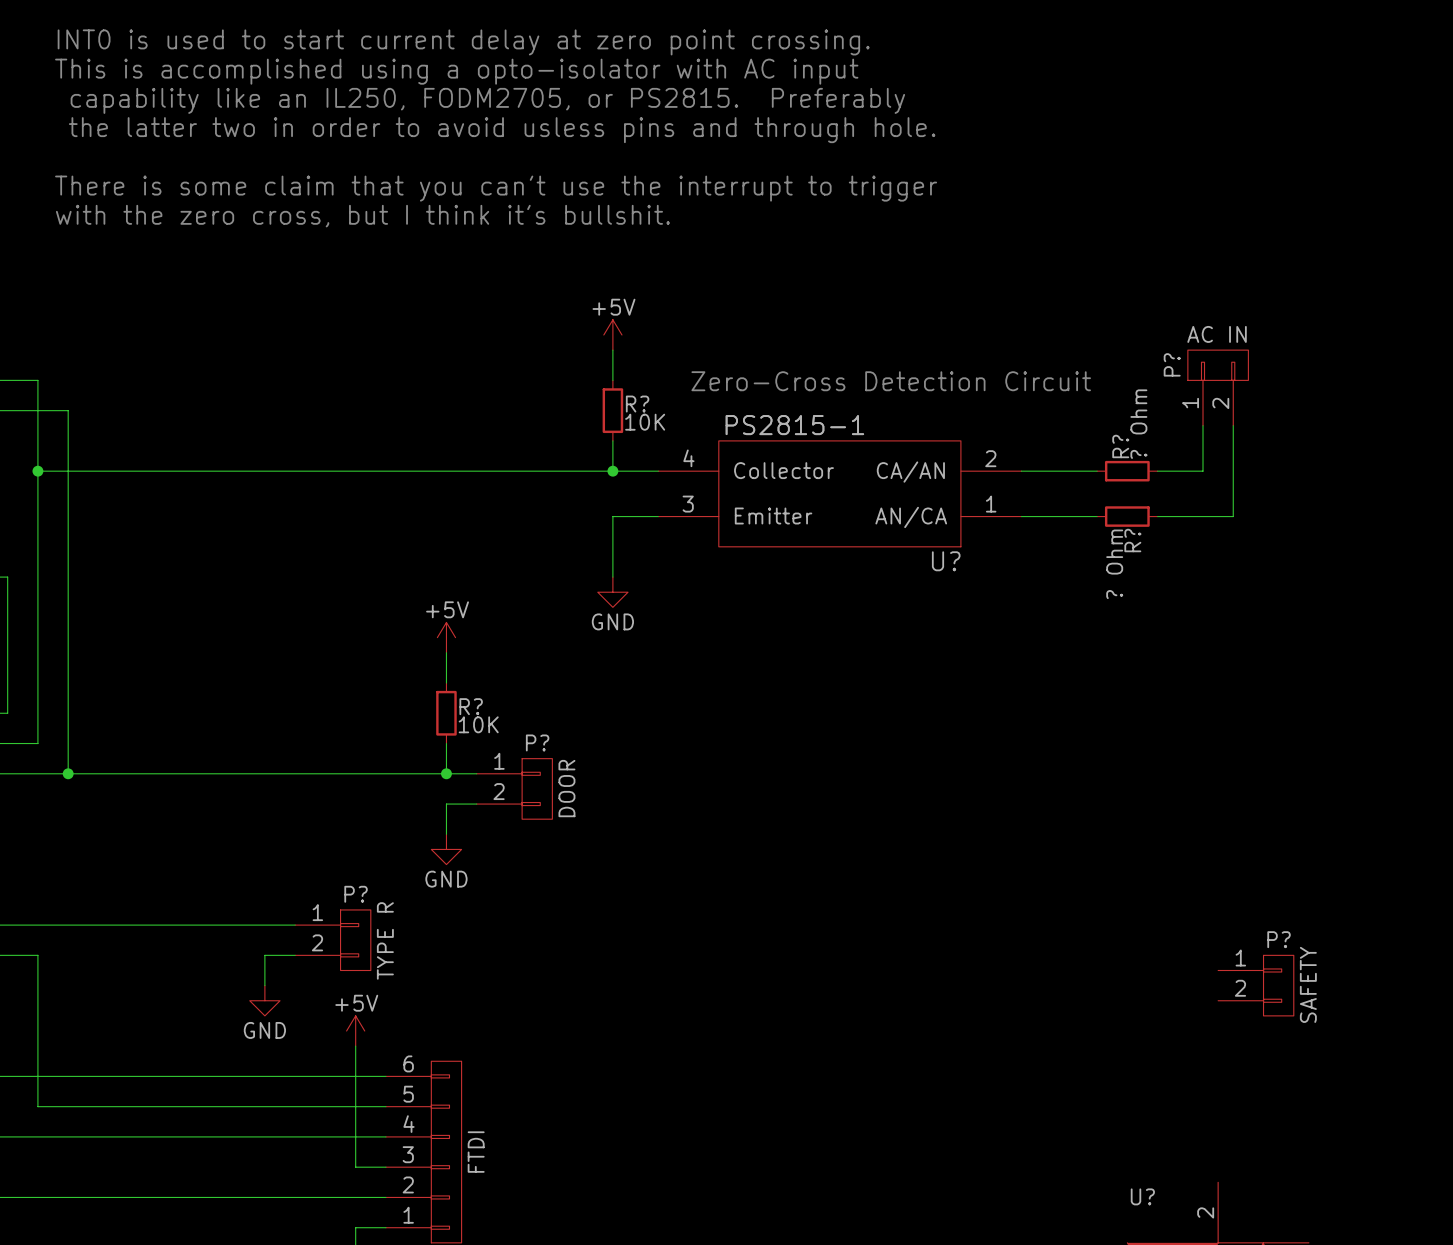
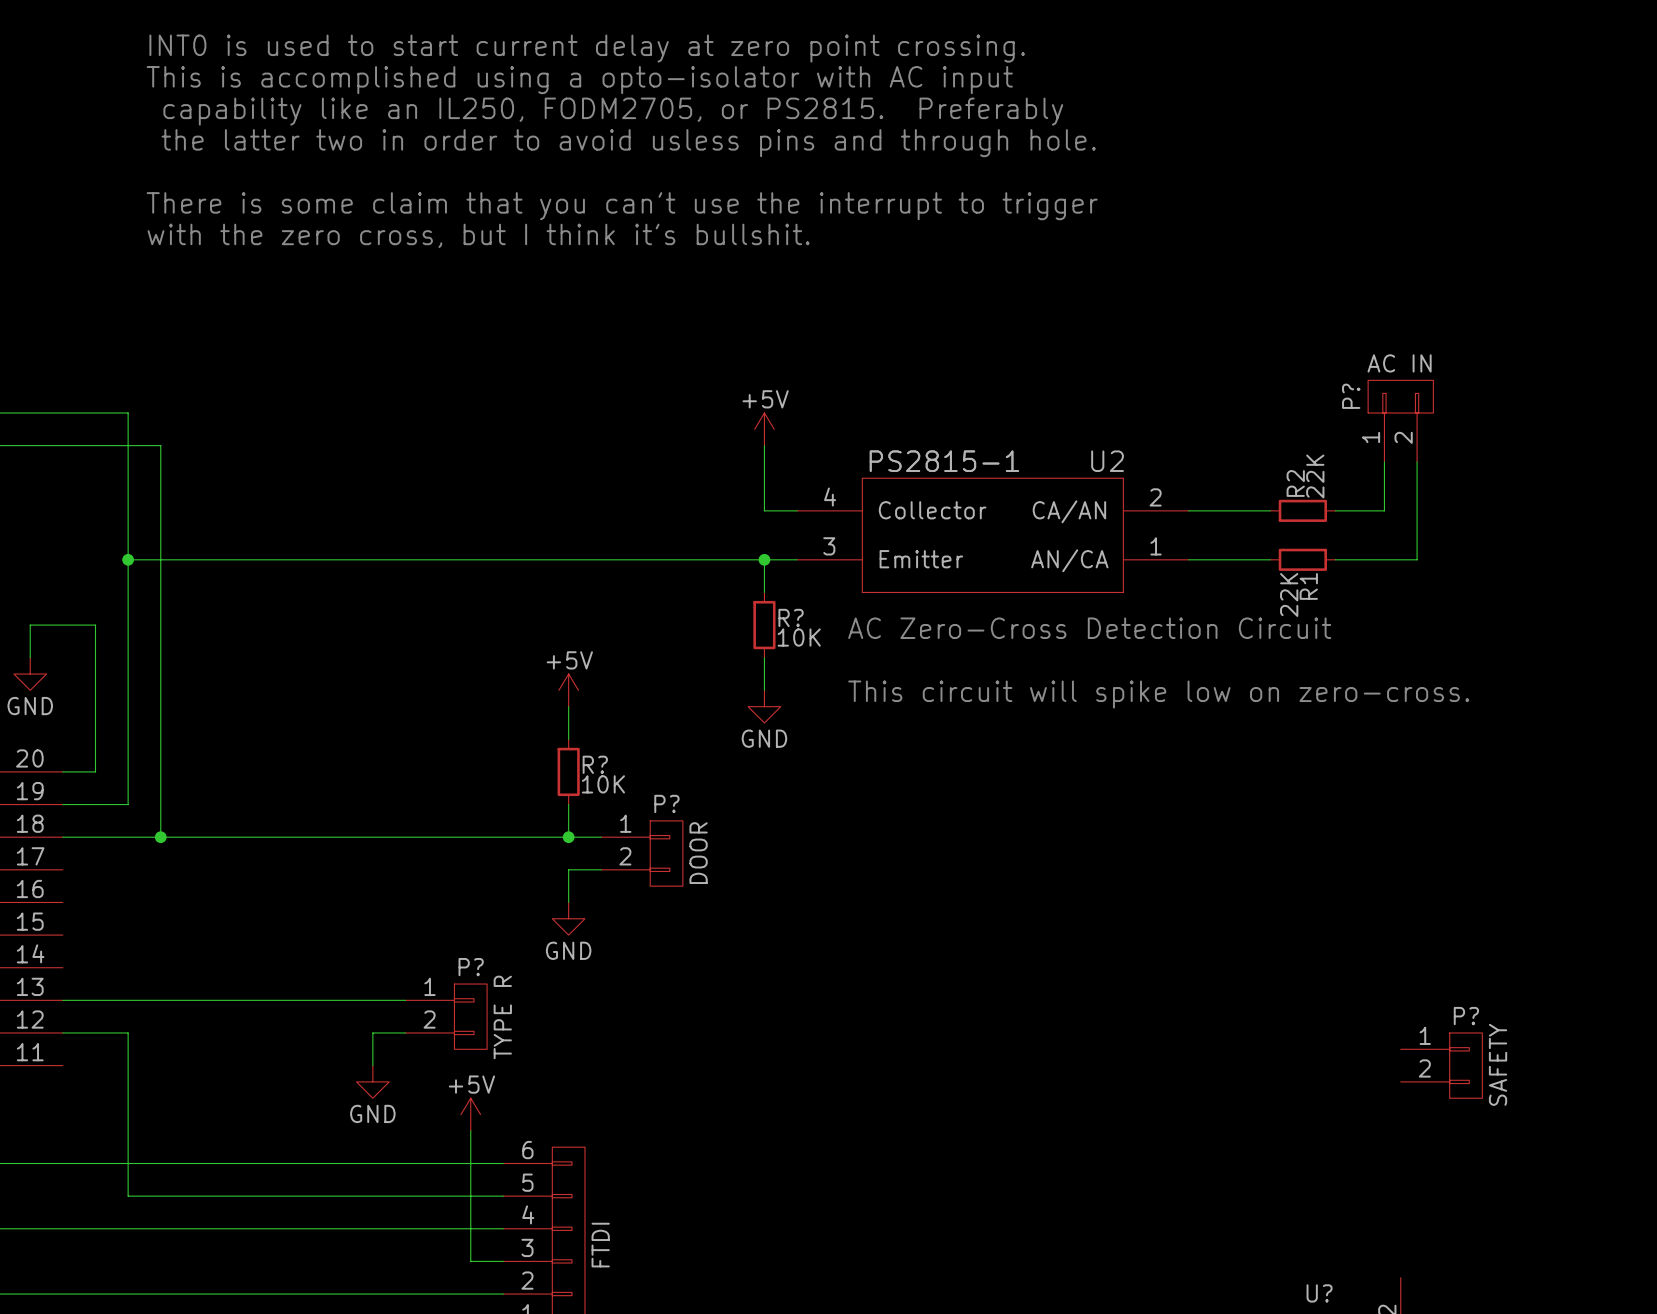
power symbol position: +5V (612, 334) -> +5V (764, 429)
wire: (612, 350) (612, 380) -> (764, 559) (764, 592)
text: Zero-Cross Detection Circuit (891, 381) -> none
R? position: (612, 410) -> (764, 625)
R? value: ? Ohm (1138, 424) -> 22K (1315, 476)
wire: (612, 440) (612, 471) -> (764, 657) (764, 690)
R? name: R? (1120, 446) -> R2 (1295, 483)
wire: (37, 471) (628, 471) -> (764, 445) (764, 510)
junction position: (37, 471) -> (128, 559)
junction position: (612, 471) -> (764, 559)
wire: (612, 516) (612, 577) -> (748, 559) (128, 559)
R? name: R? (1132, 540) -> R1 (1308, 586)
U? name: U? (946, 561) -> U2 (1107, 461)
R? value: ? Ohm (1114, 564) -> 22K (1289, 594)
text: none -> AC Zero-Cross Detection Circuit (1089, 628)
power symbol position: GND (612, 592) -> GND (764, 706)
text: none -> This circuit will spike low on zero-cross. (1158, 694)

